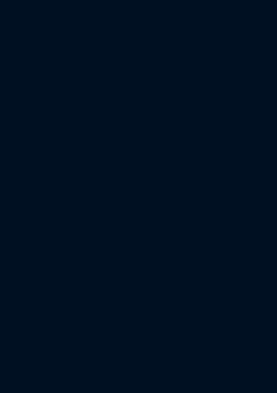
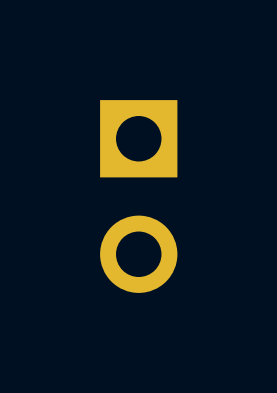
part: none -> (138, 196)

